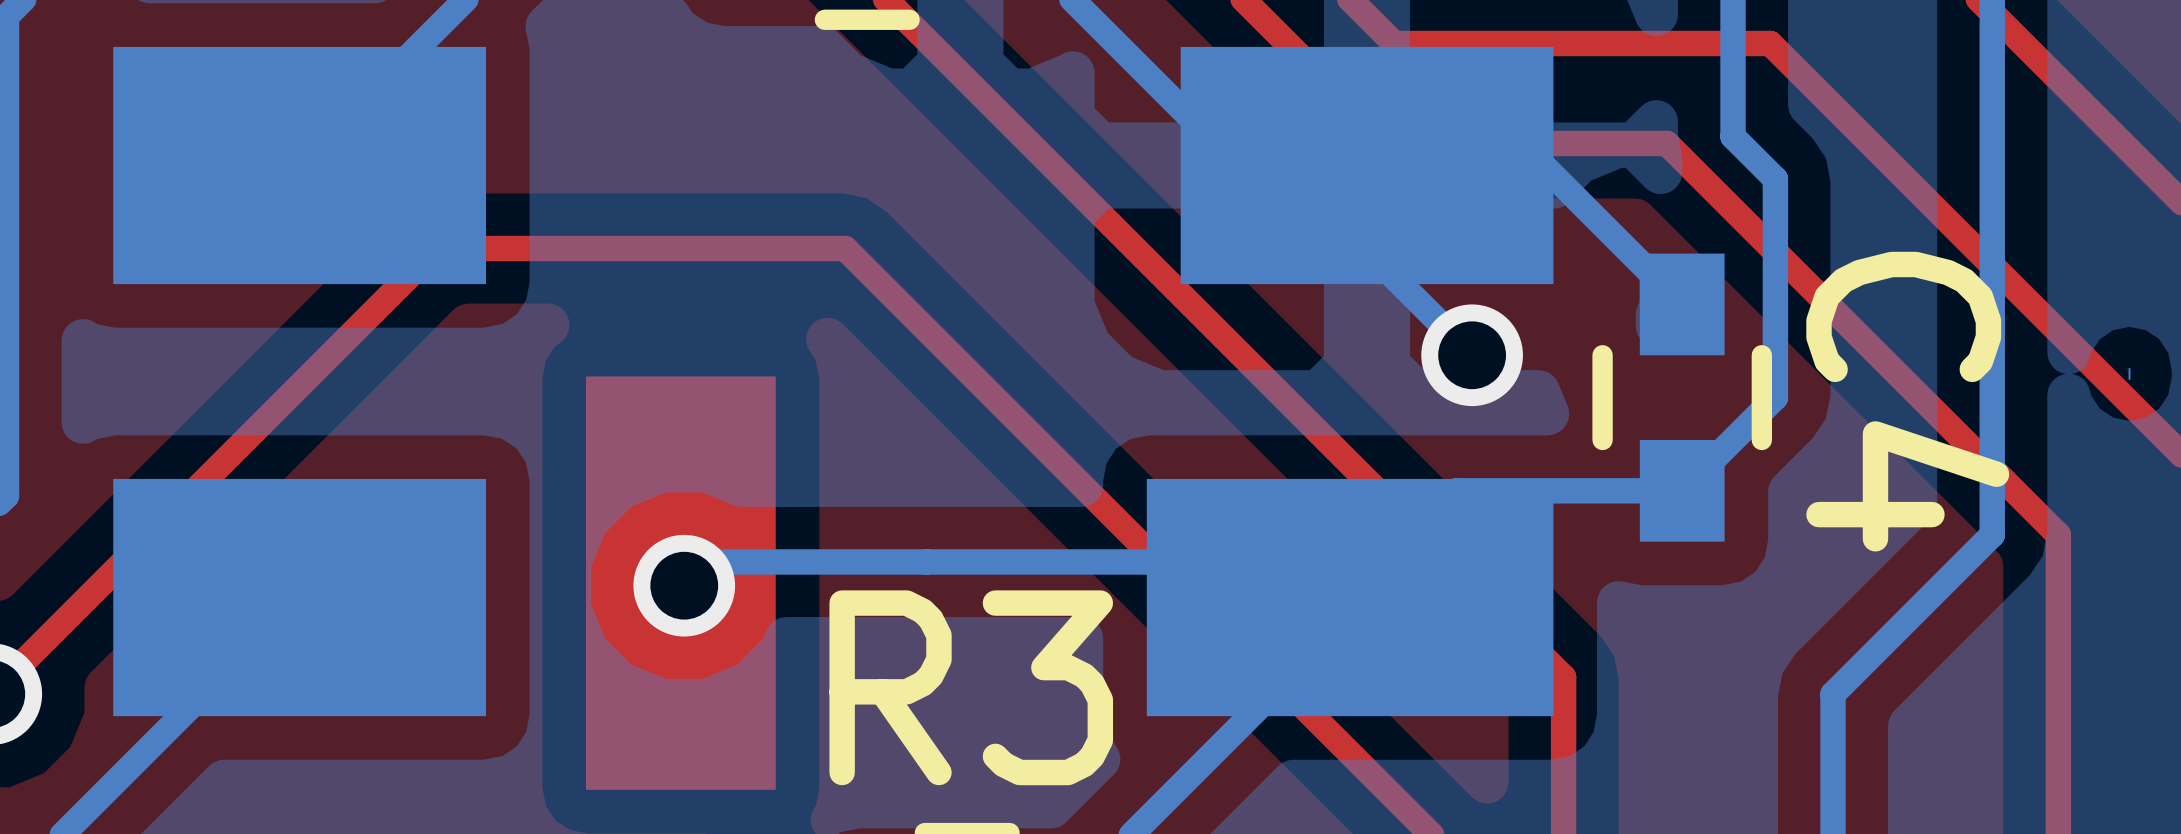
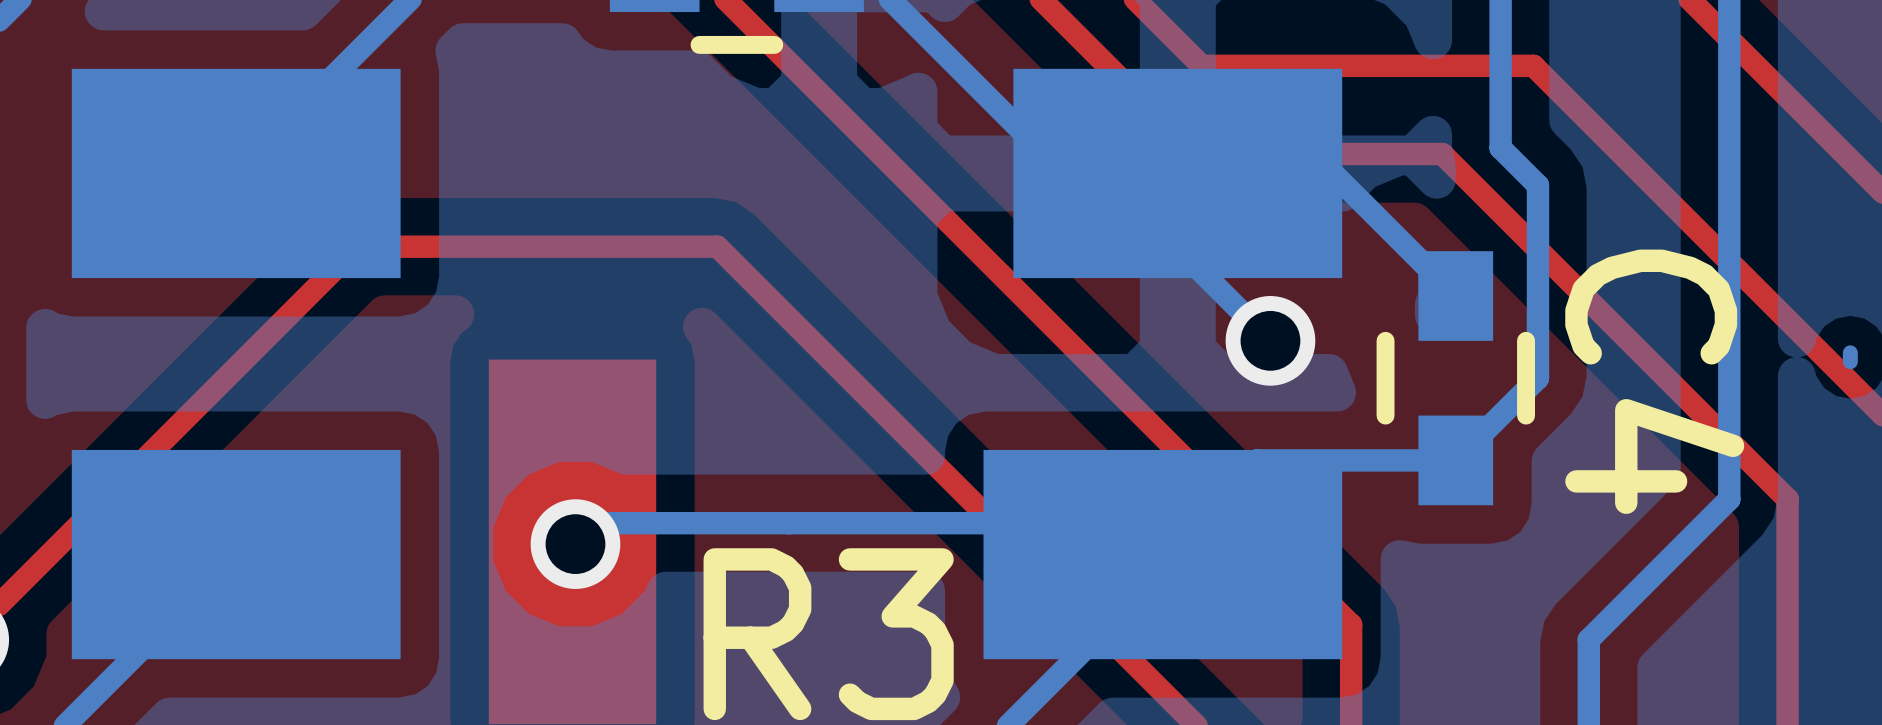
part footprint: [113, 46, 2130, 717] -> [71, 68, 1858, 660]

